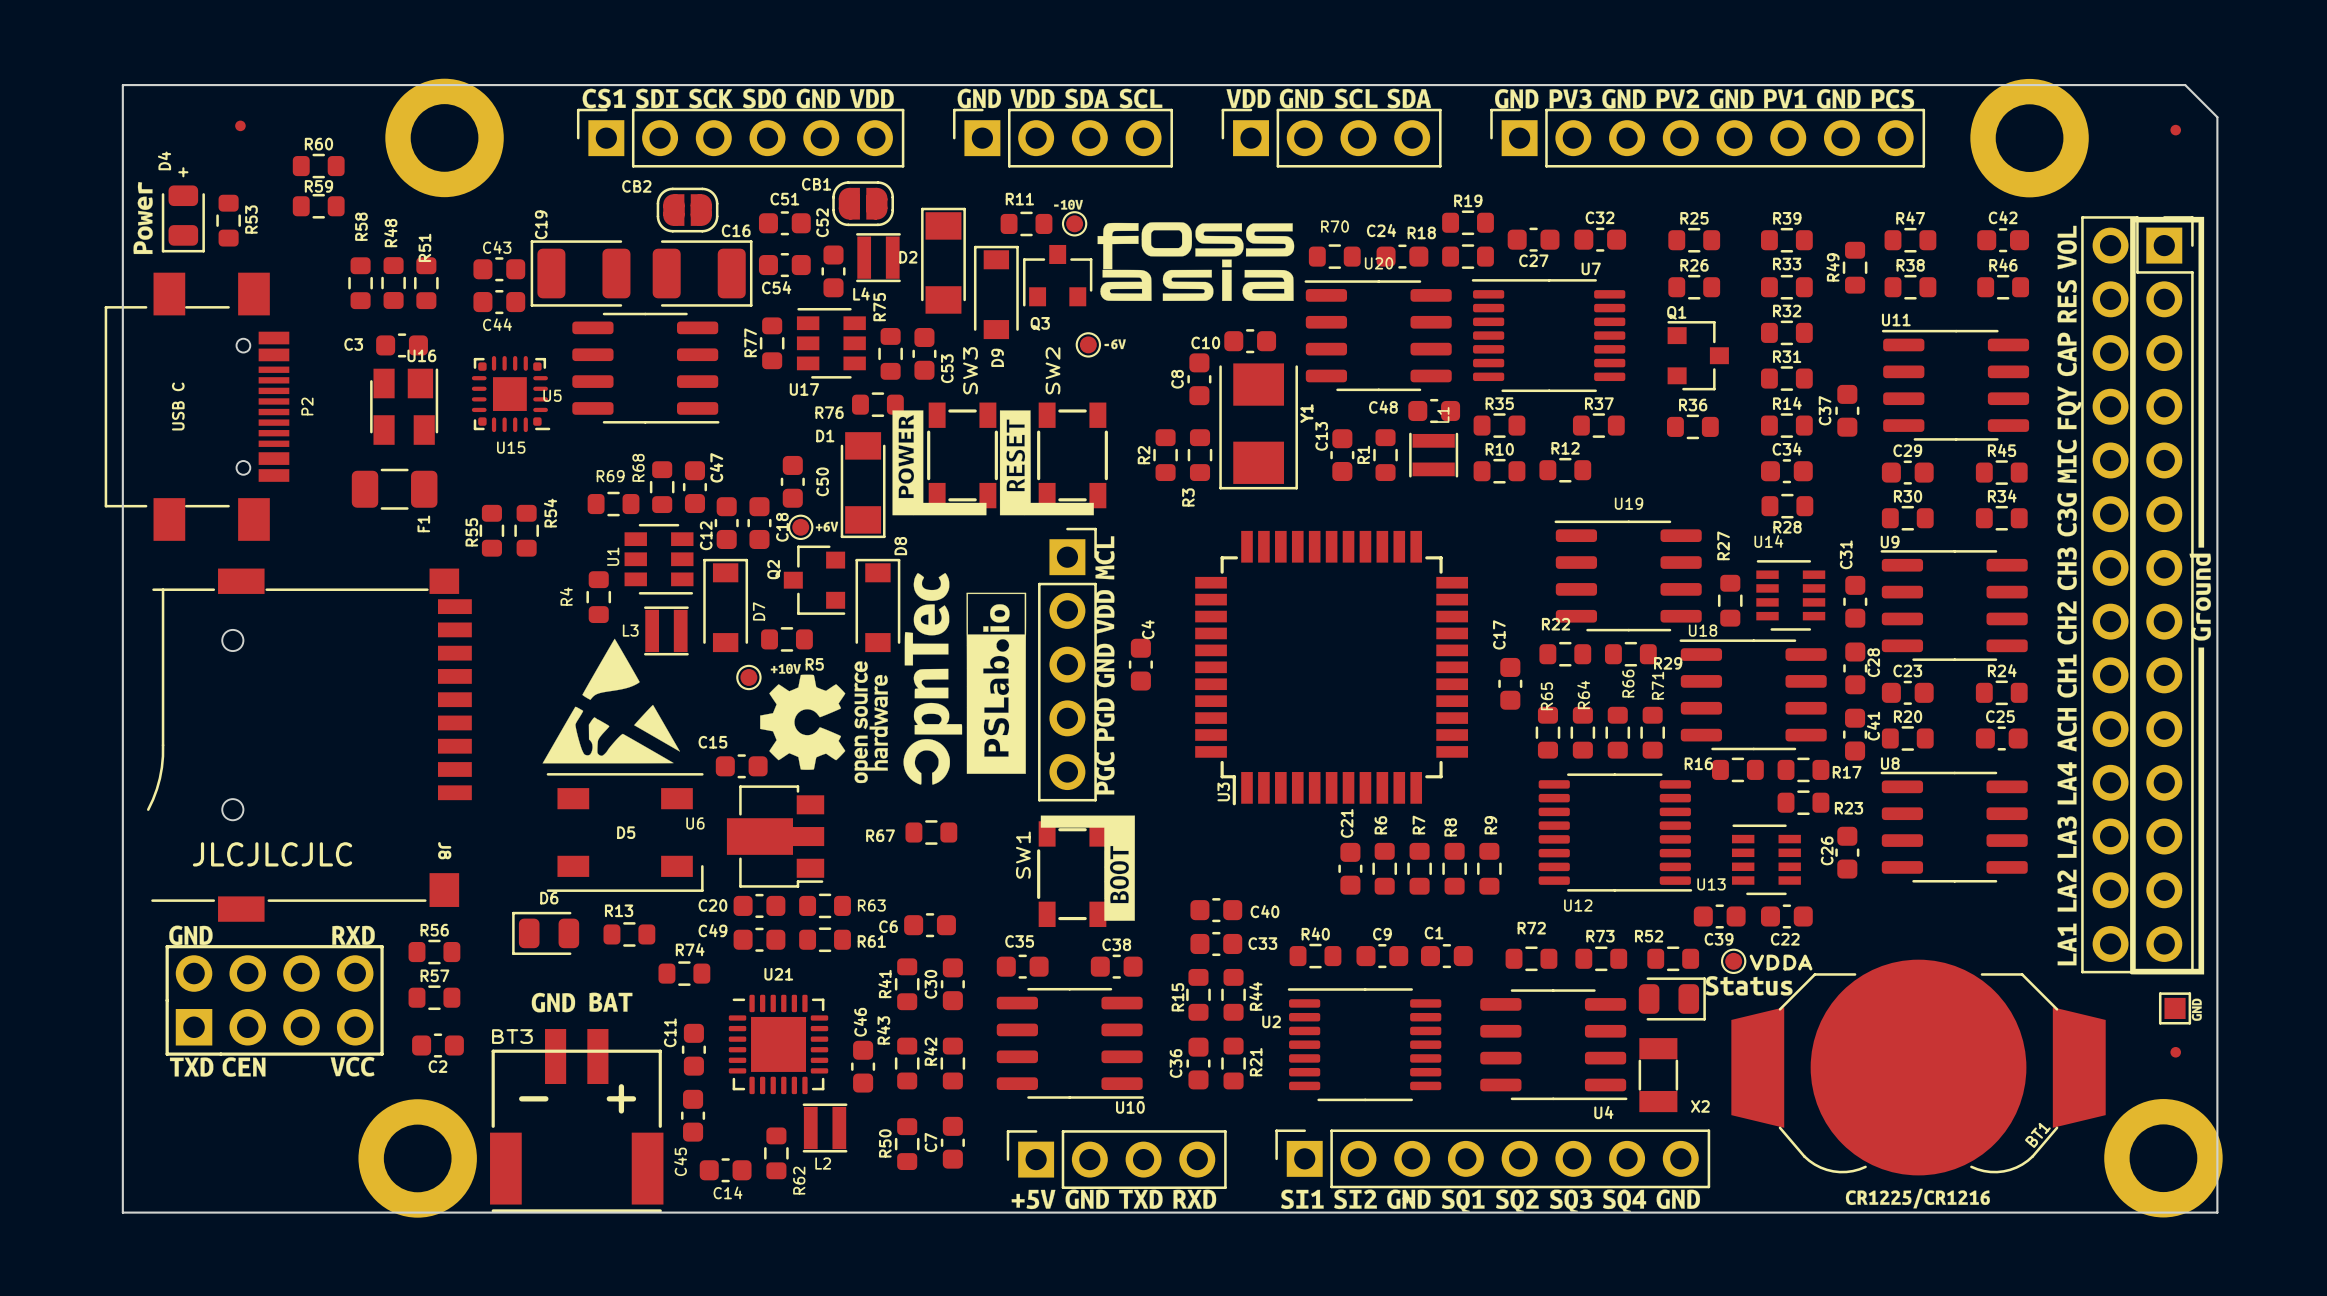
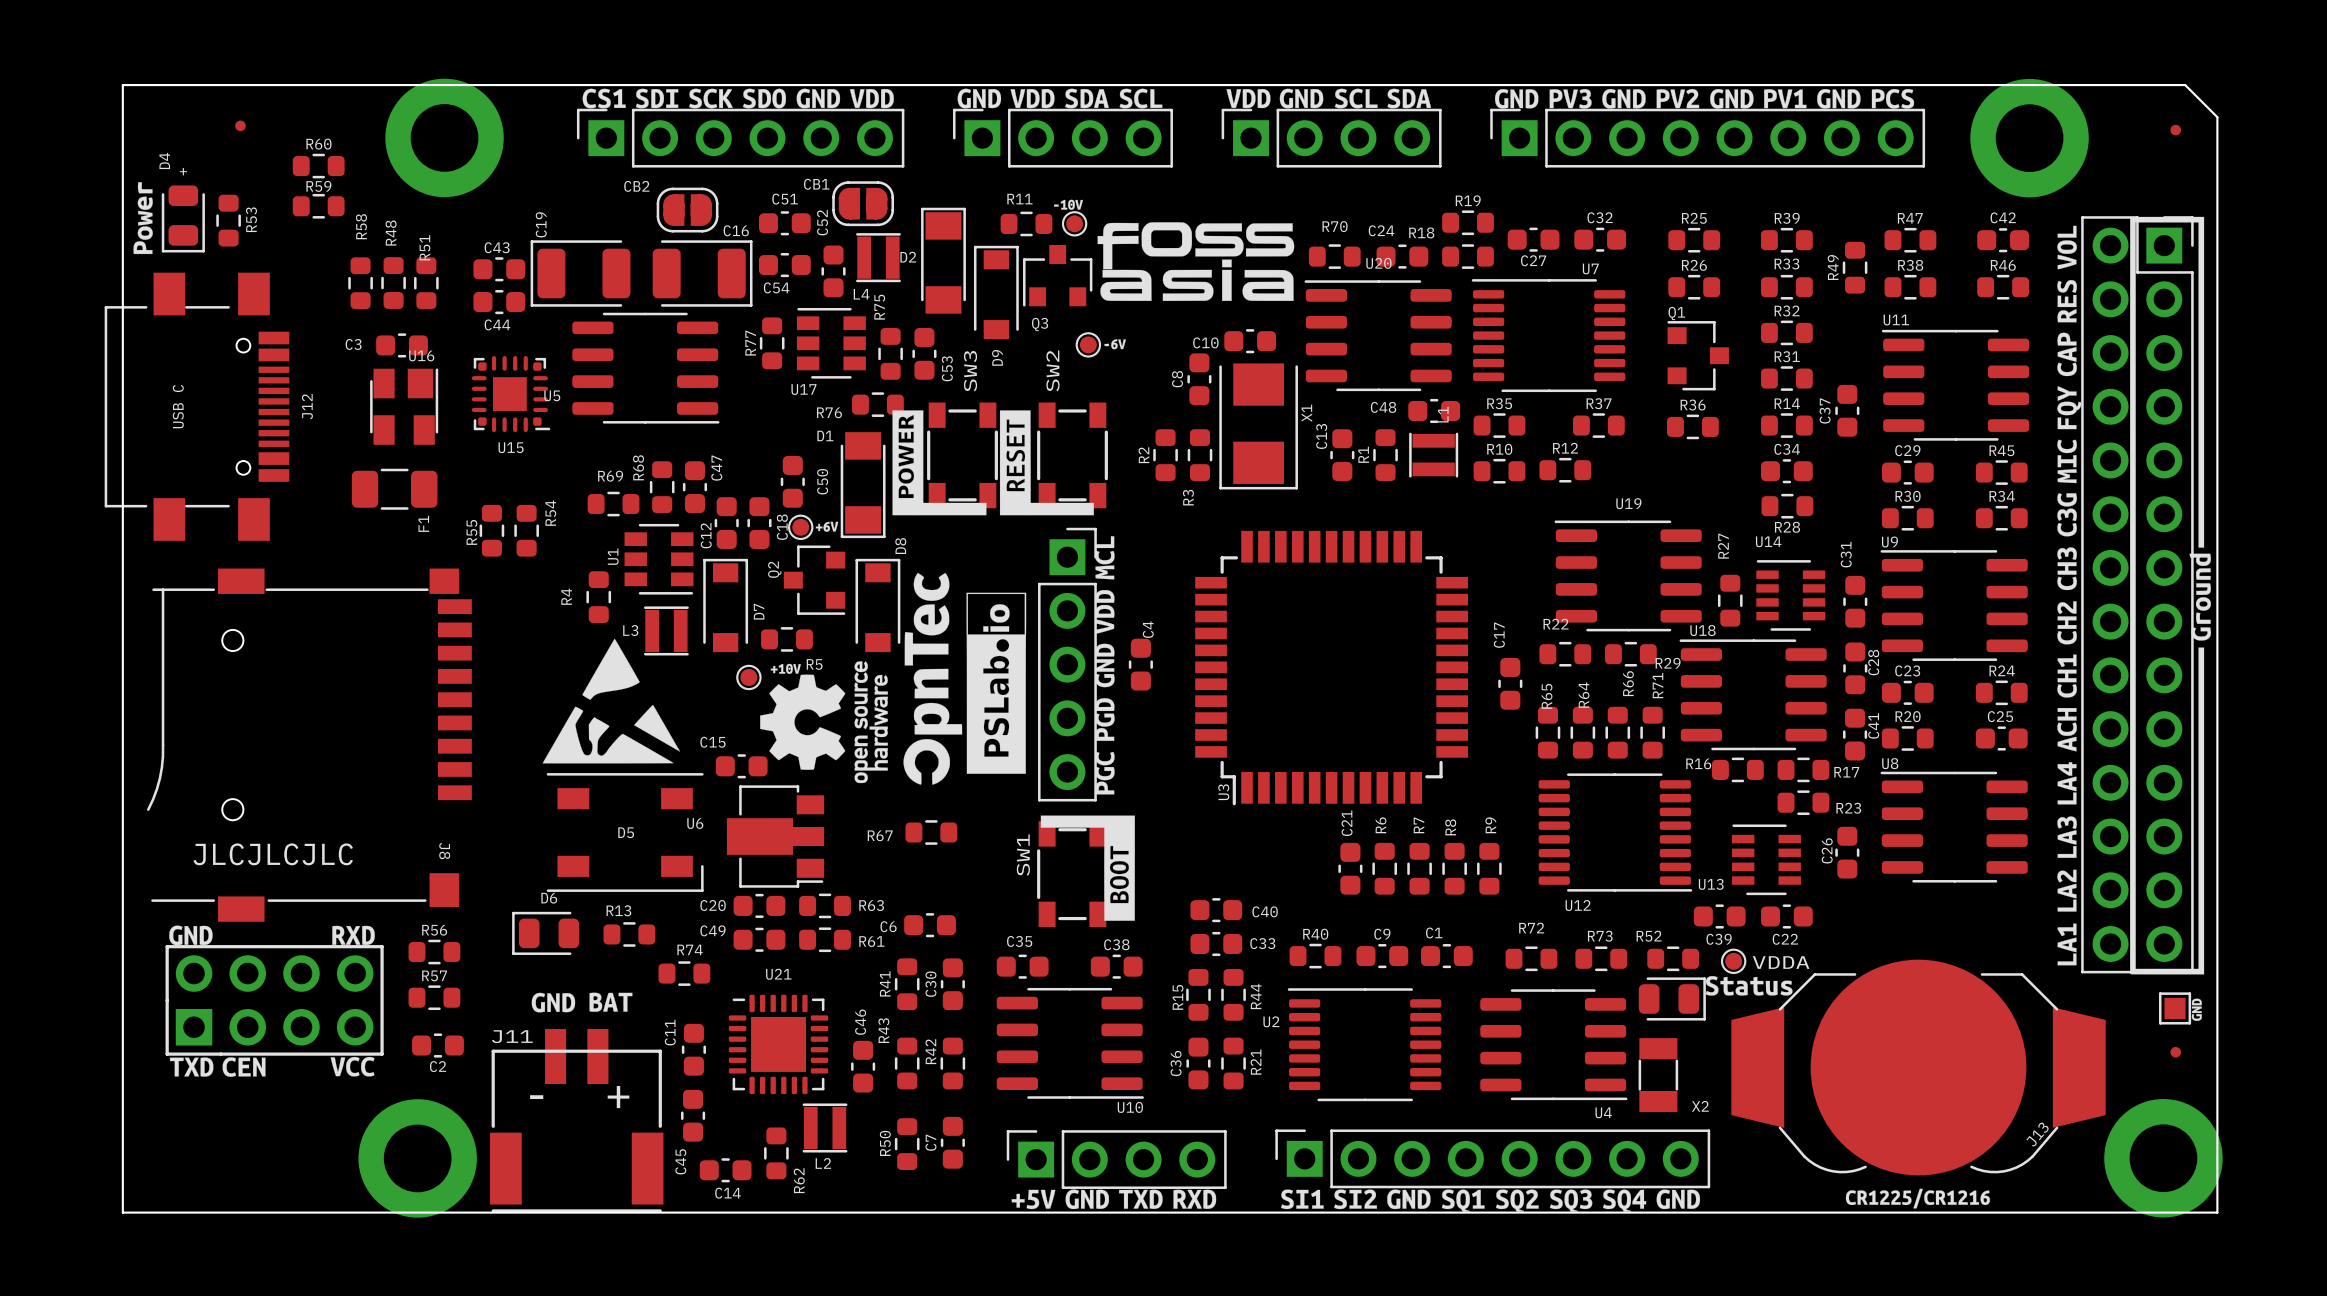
P2 name: P2 (307, 406) -> J12 (307, 406)
Y1 name: Y1 (1306, 413) -> X1 (1306, 413)
BT3 name: BT3 (512, 1036) -> J11 (512, 1036)
BT1 name: BT1 (2037, 1135) -> J13 (2037, 1134)

